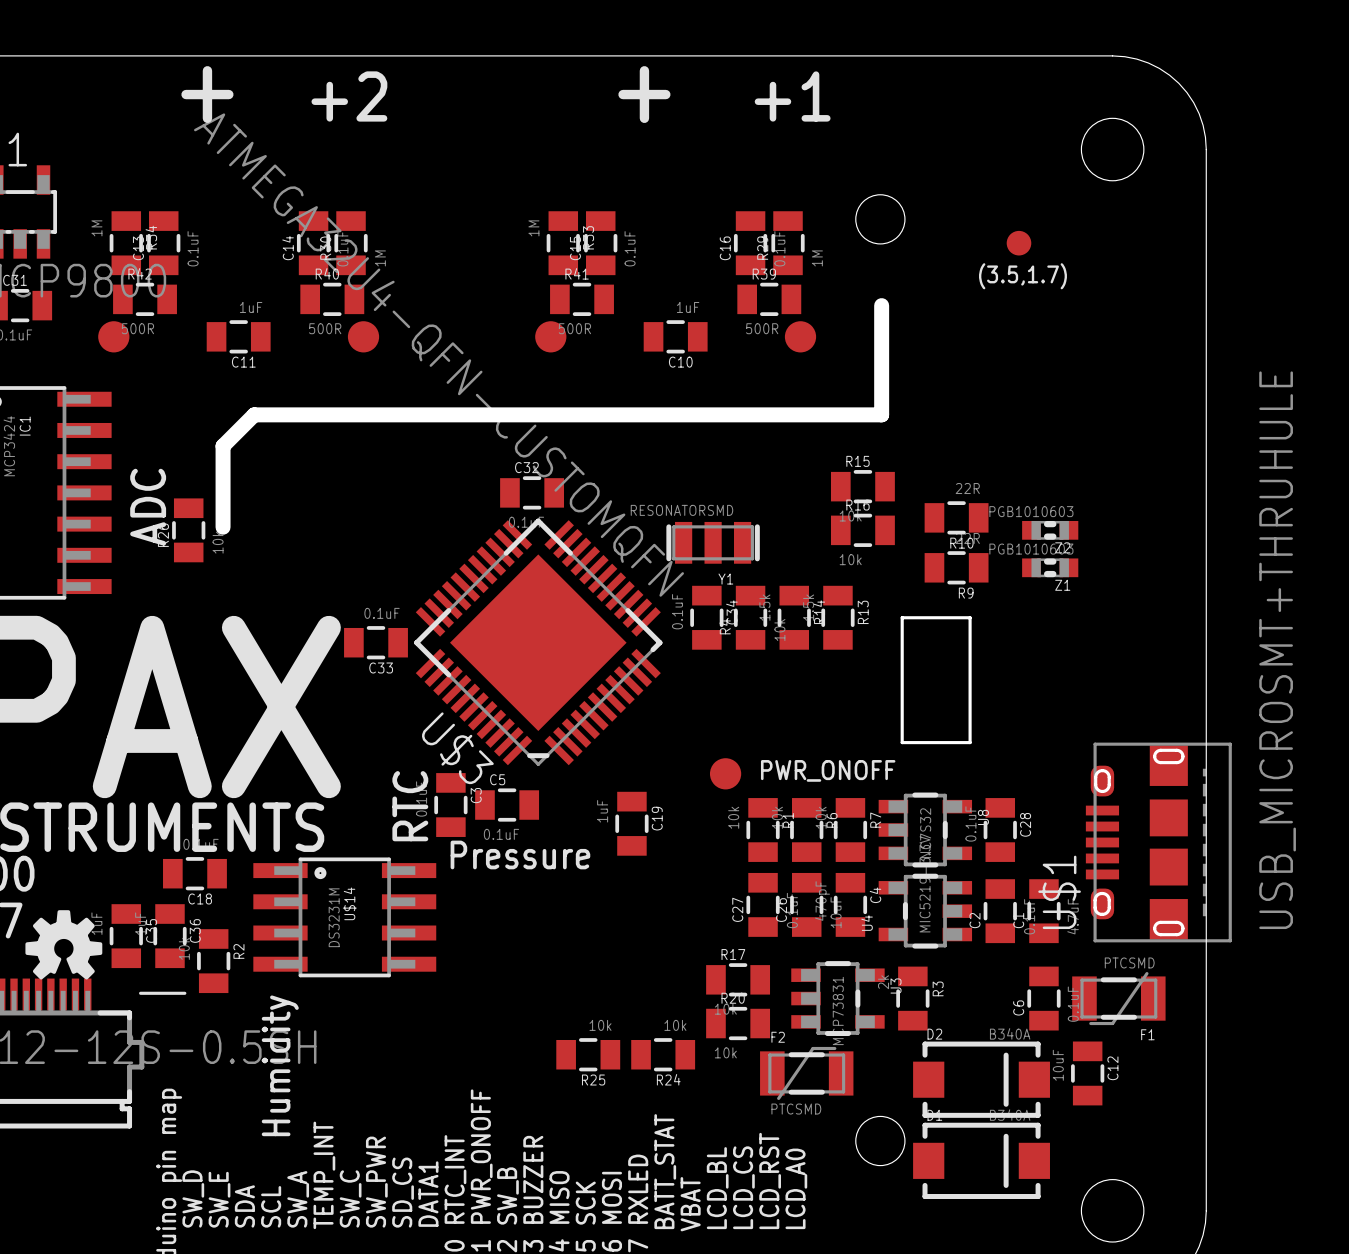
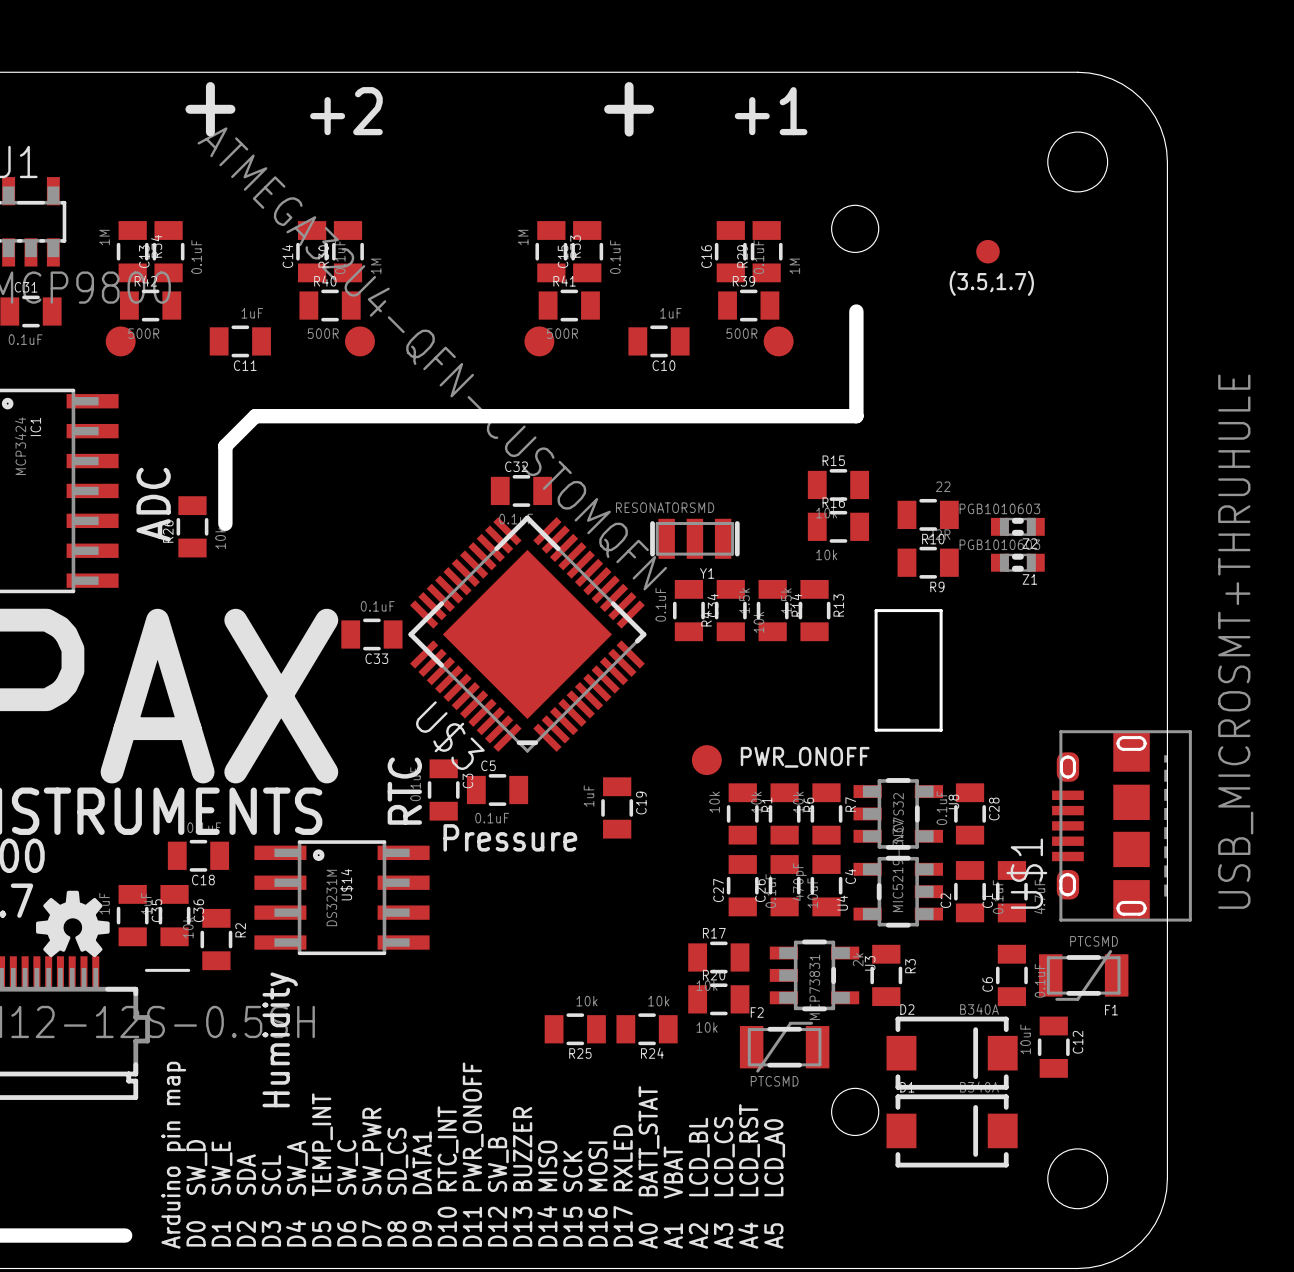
R10 value: 22R (967, 488) -> 22 (943, 486)

